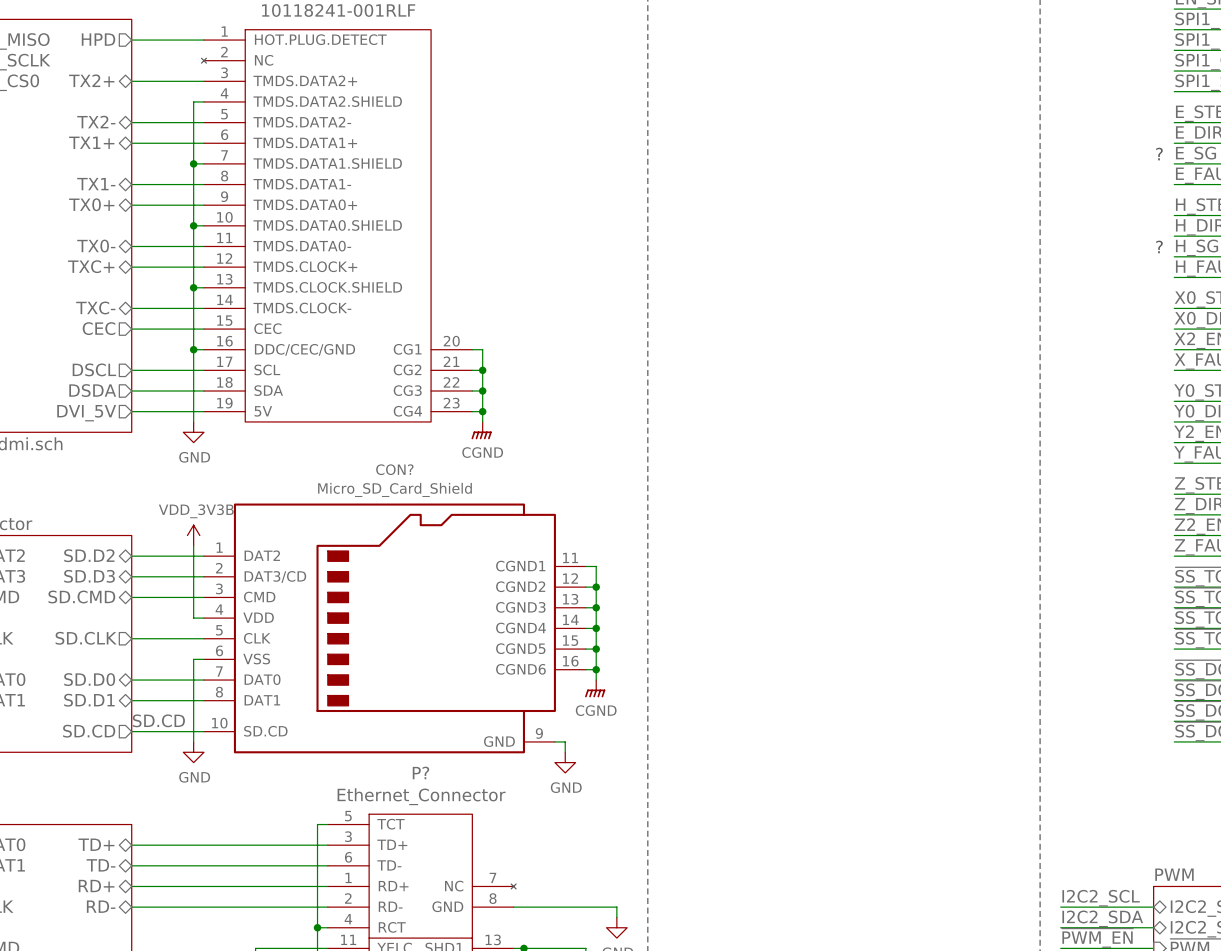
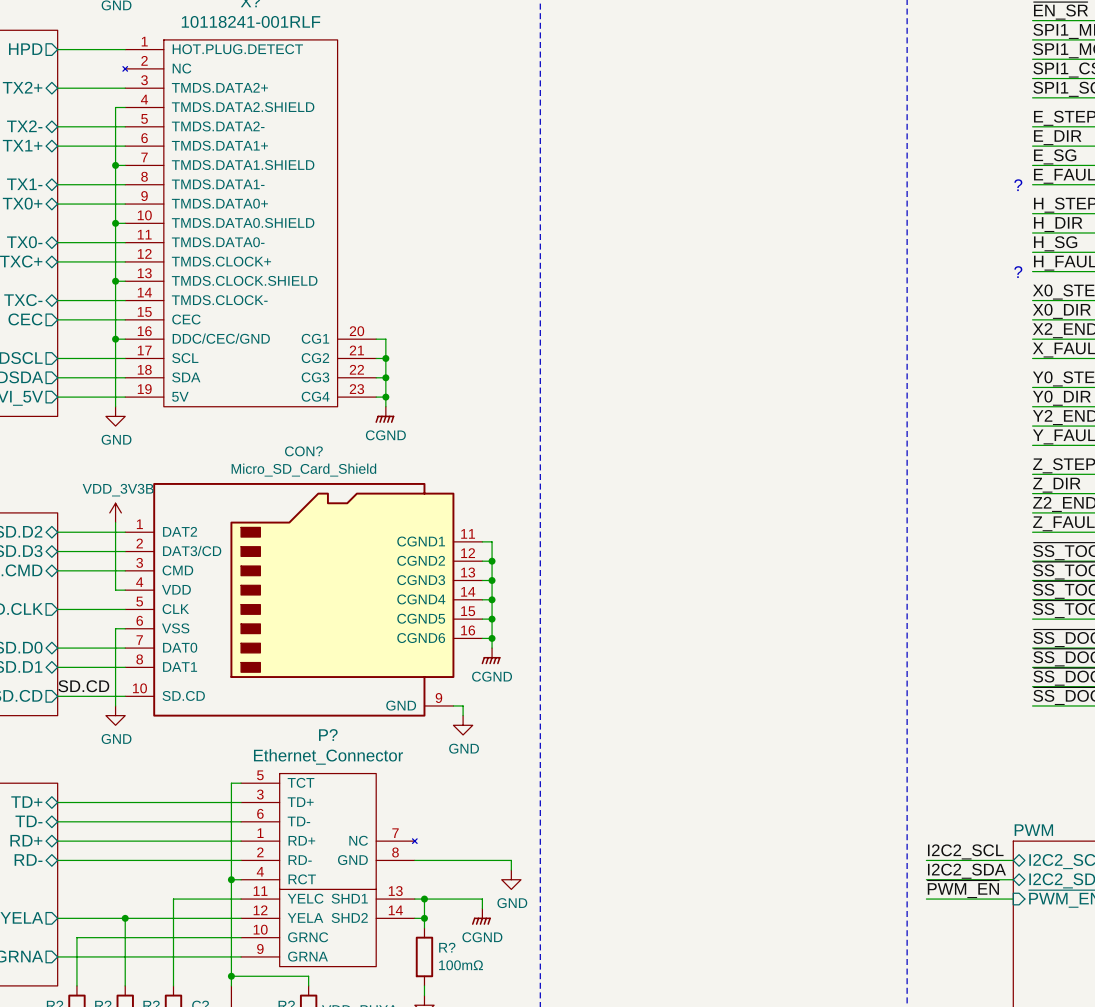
text: ? (1159, 154) -> none
text: none -> ? (1018, 185)
text: ? (1159, 246) -> none
text: none -> ? (1018, 272)

